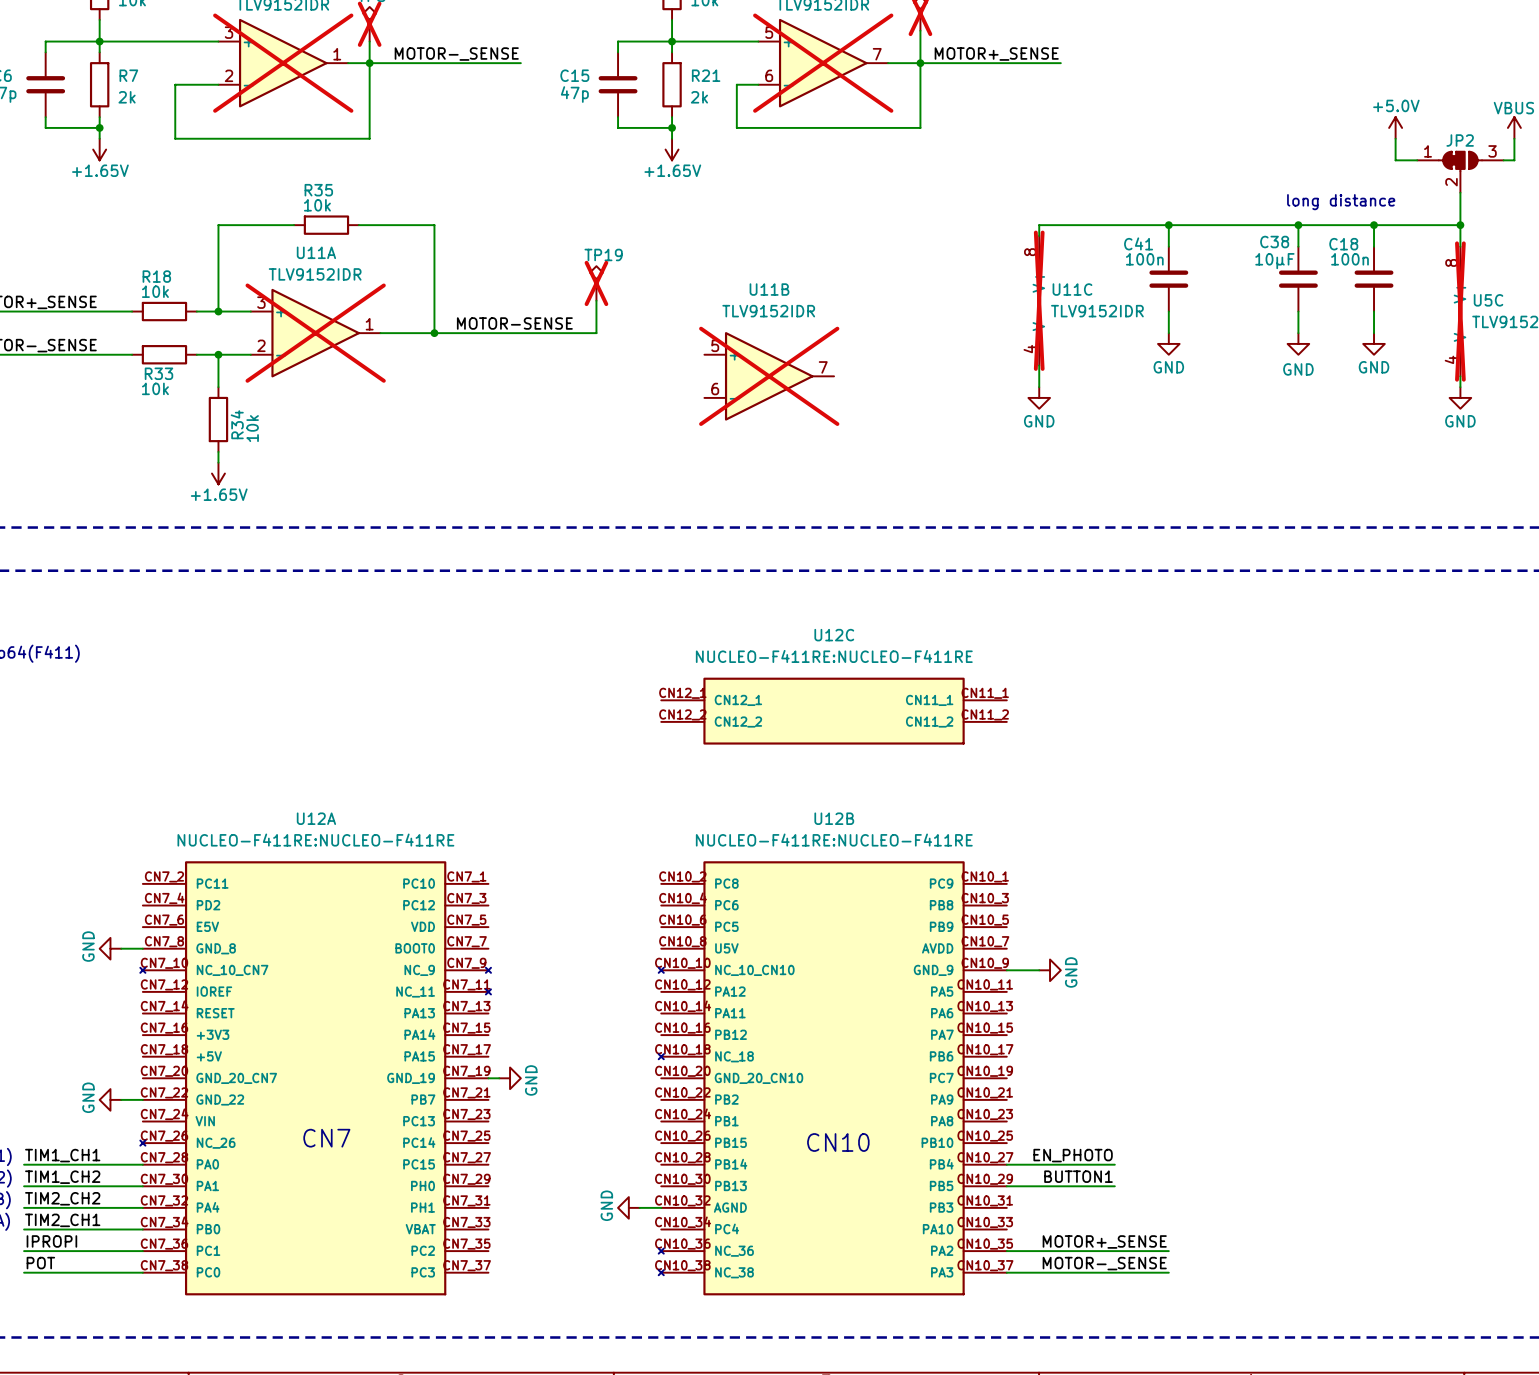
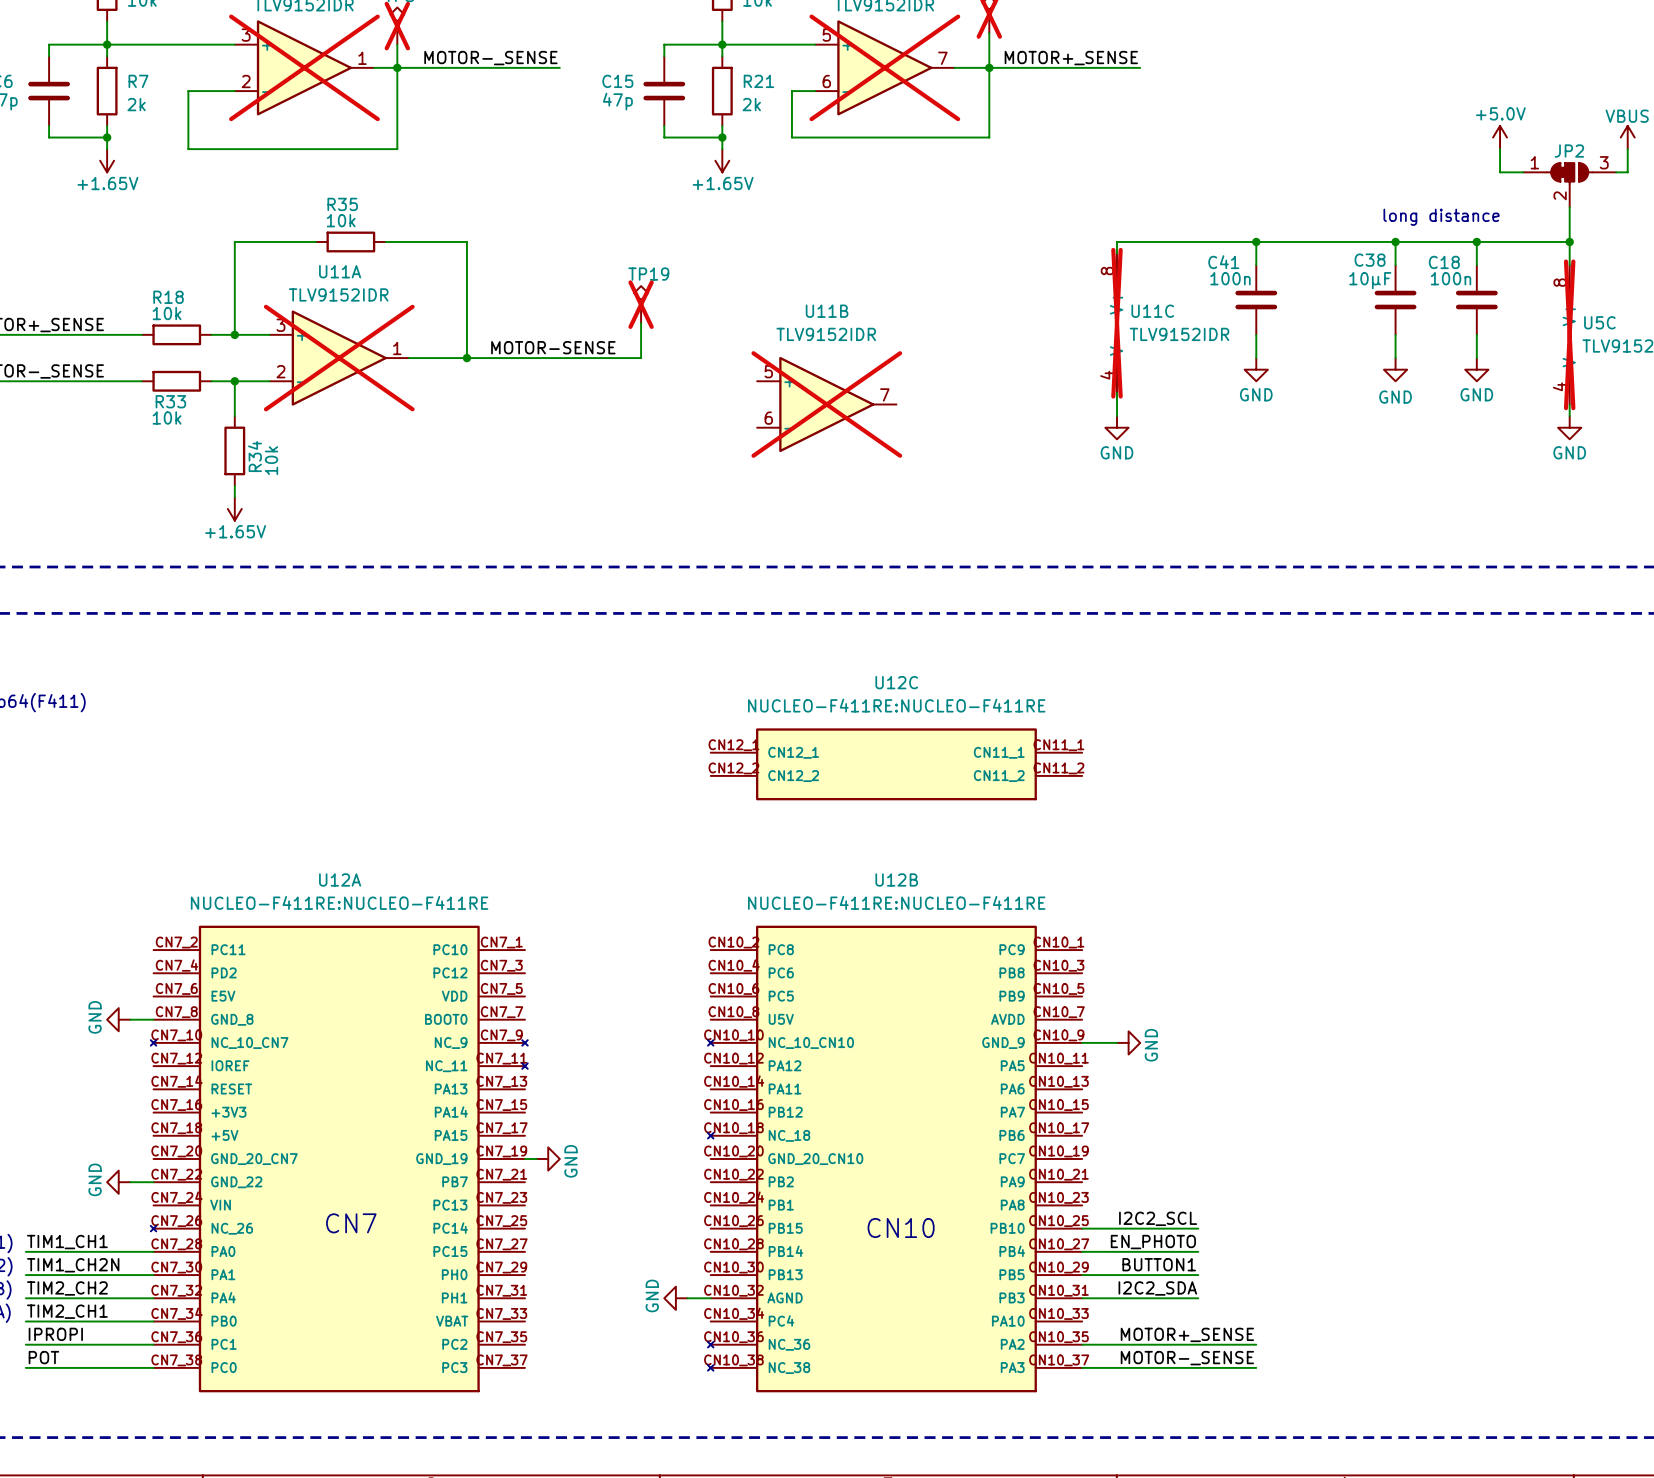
label: none -> I2C2_SCL (1158, 1218)
wire: none -> (1082, 1228) (1198, 1228)
label: TIM1_CH2 (62, 1177) -> TIM1_CH2N (73, 1265)
label: none -> I2C2_SDA (1157, 1288)
wire: none -> (1082, 1298) (1198, 1298)

